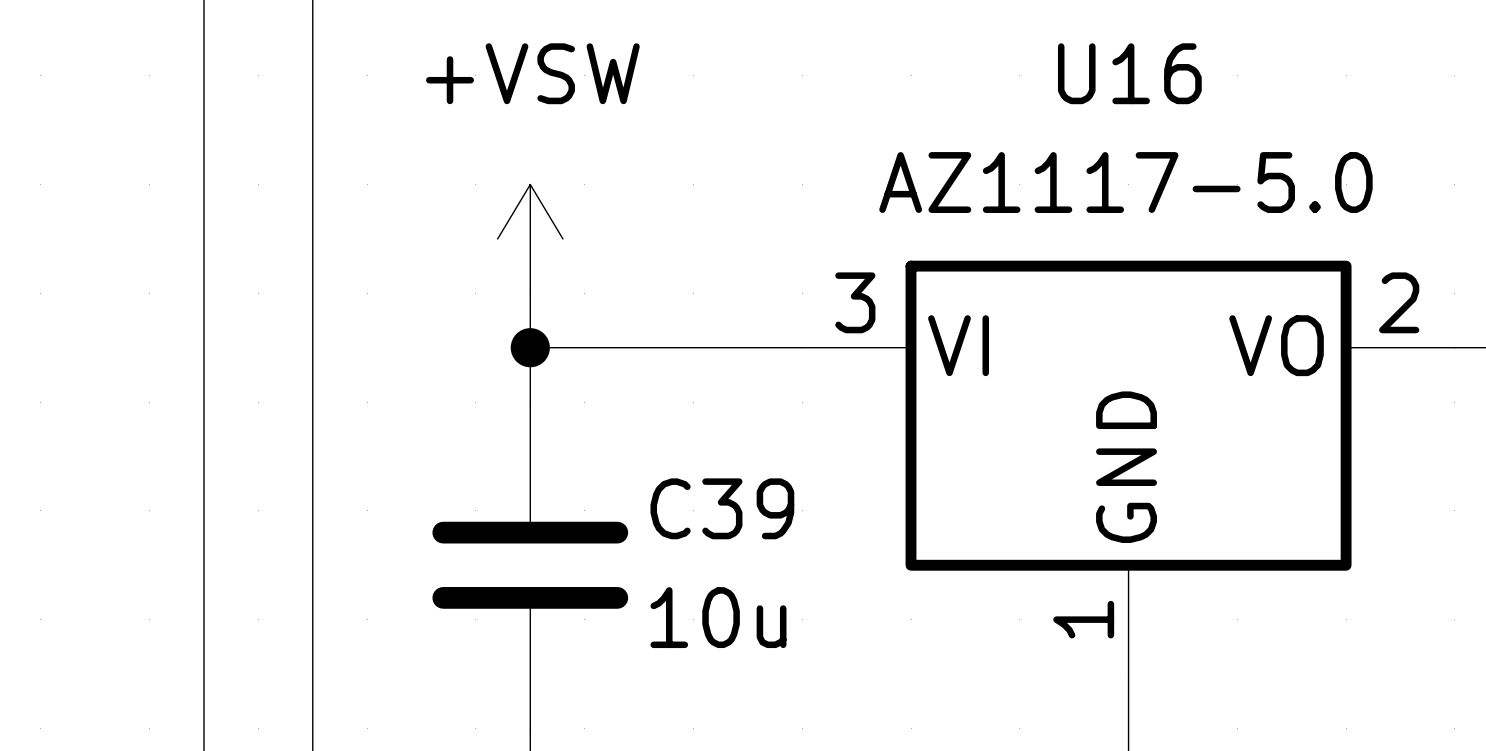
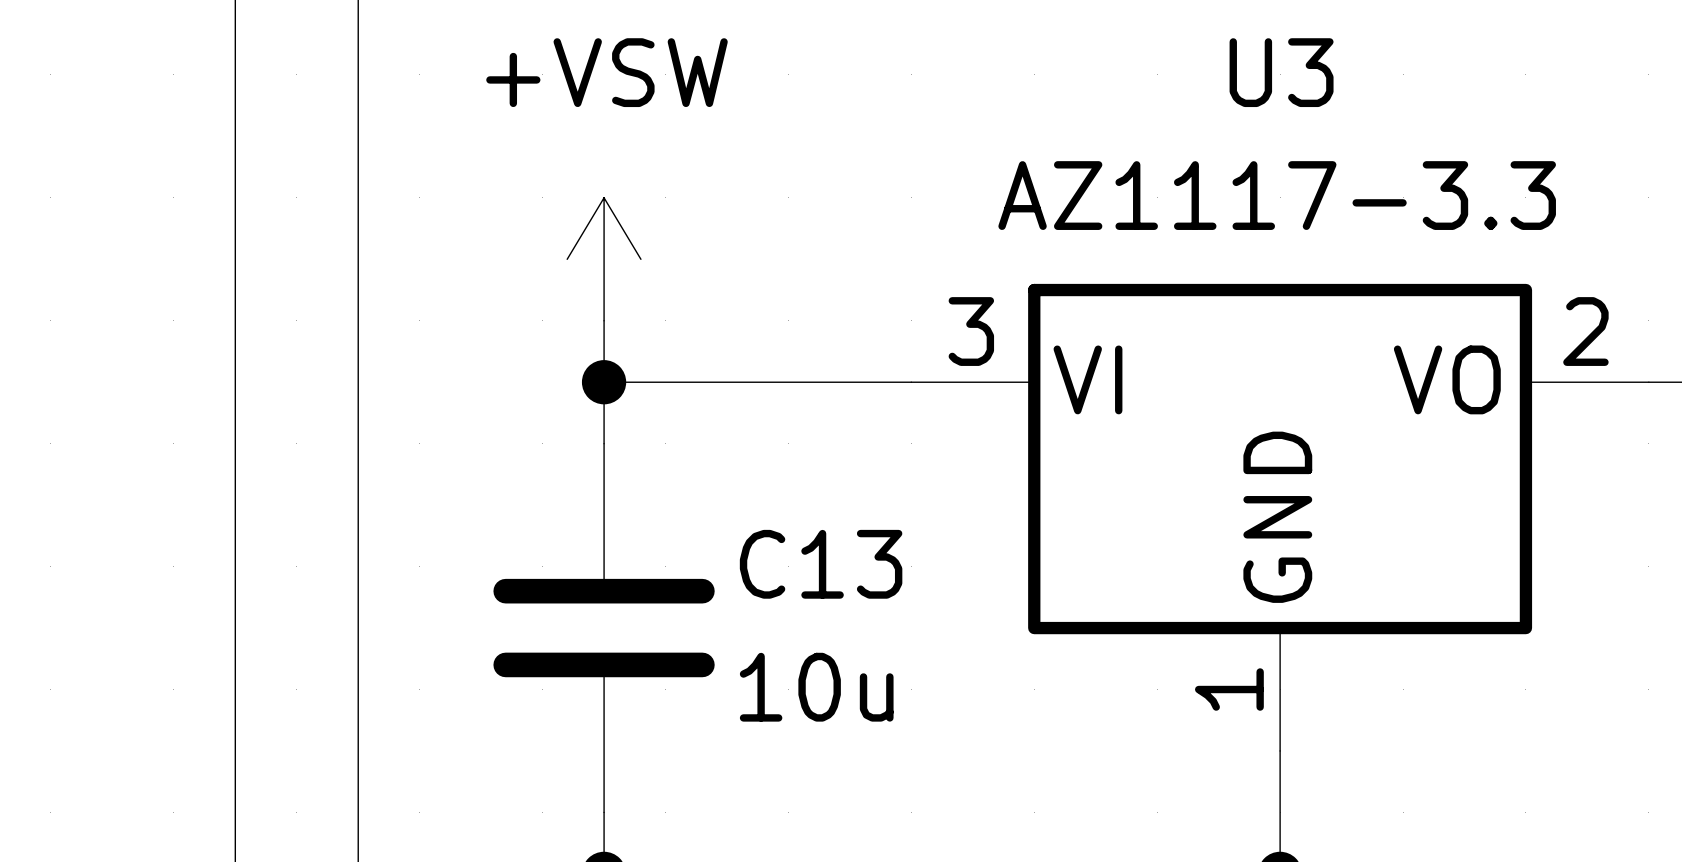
U16 name: U16 (1129, 73) -> U3 (1281, 72)
U16 value: AZ1117-5.0 (1125, 182) -> AZ1117-3.3 (1277, 195)
C39 name: C39 (722, 508) -> C13 (821, 564)

